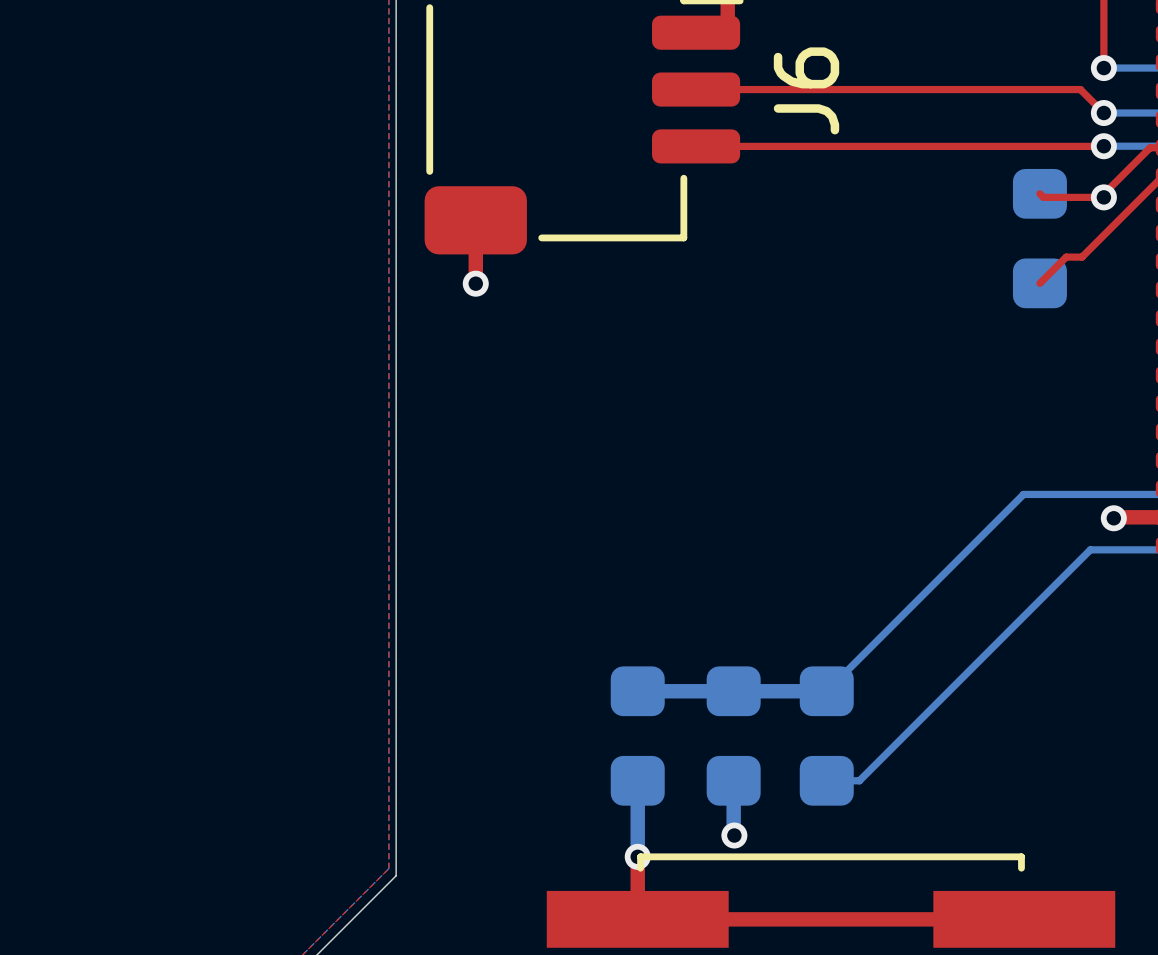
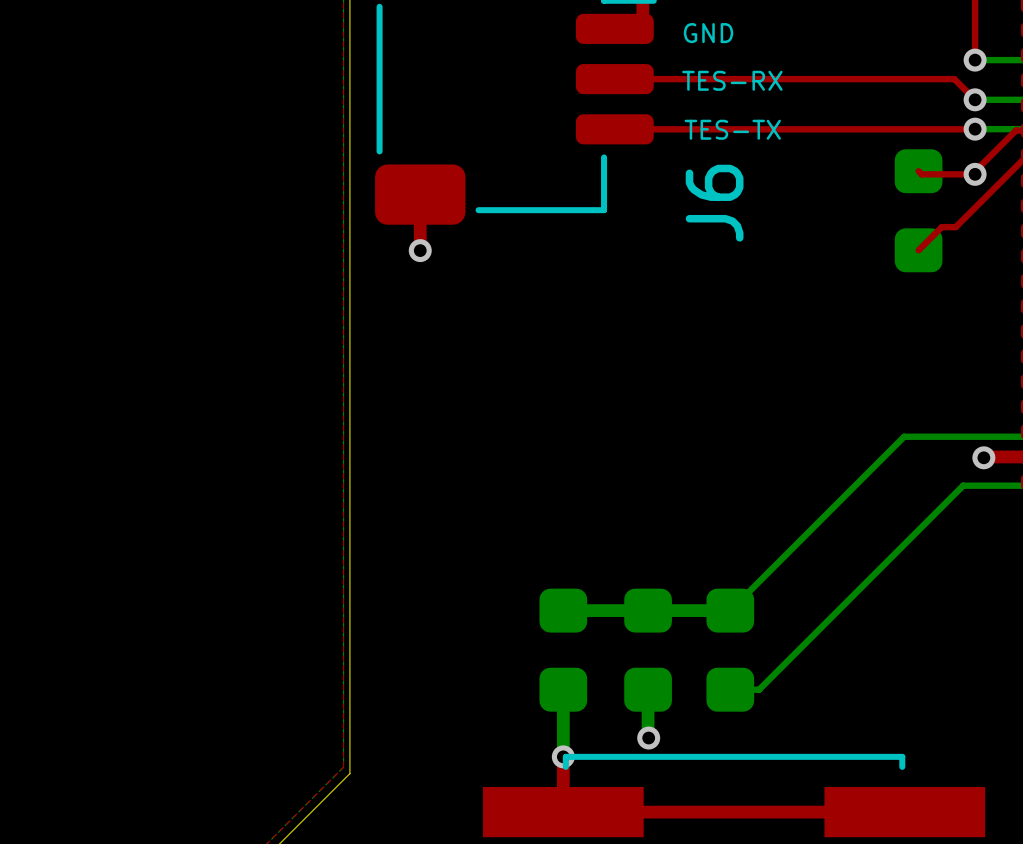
text: none -> GND (708, 33)
J6 name position: J6 (806, 90) -> J6 (714, 203)
text: none -> TES-RX (732, 80)
text: none -> TES-TX (732, 129)

